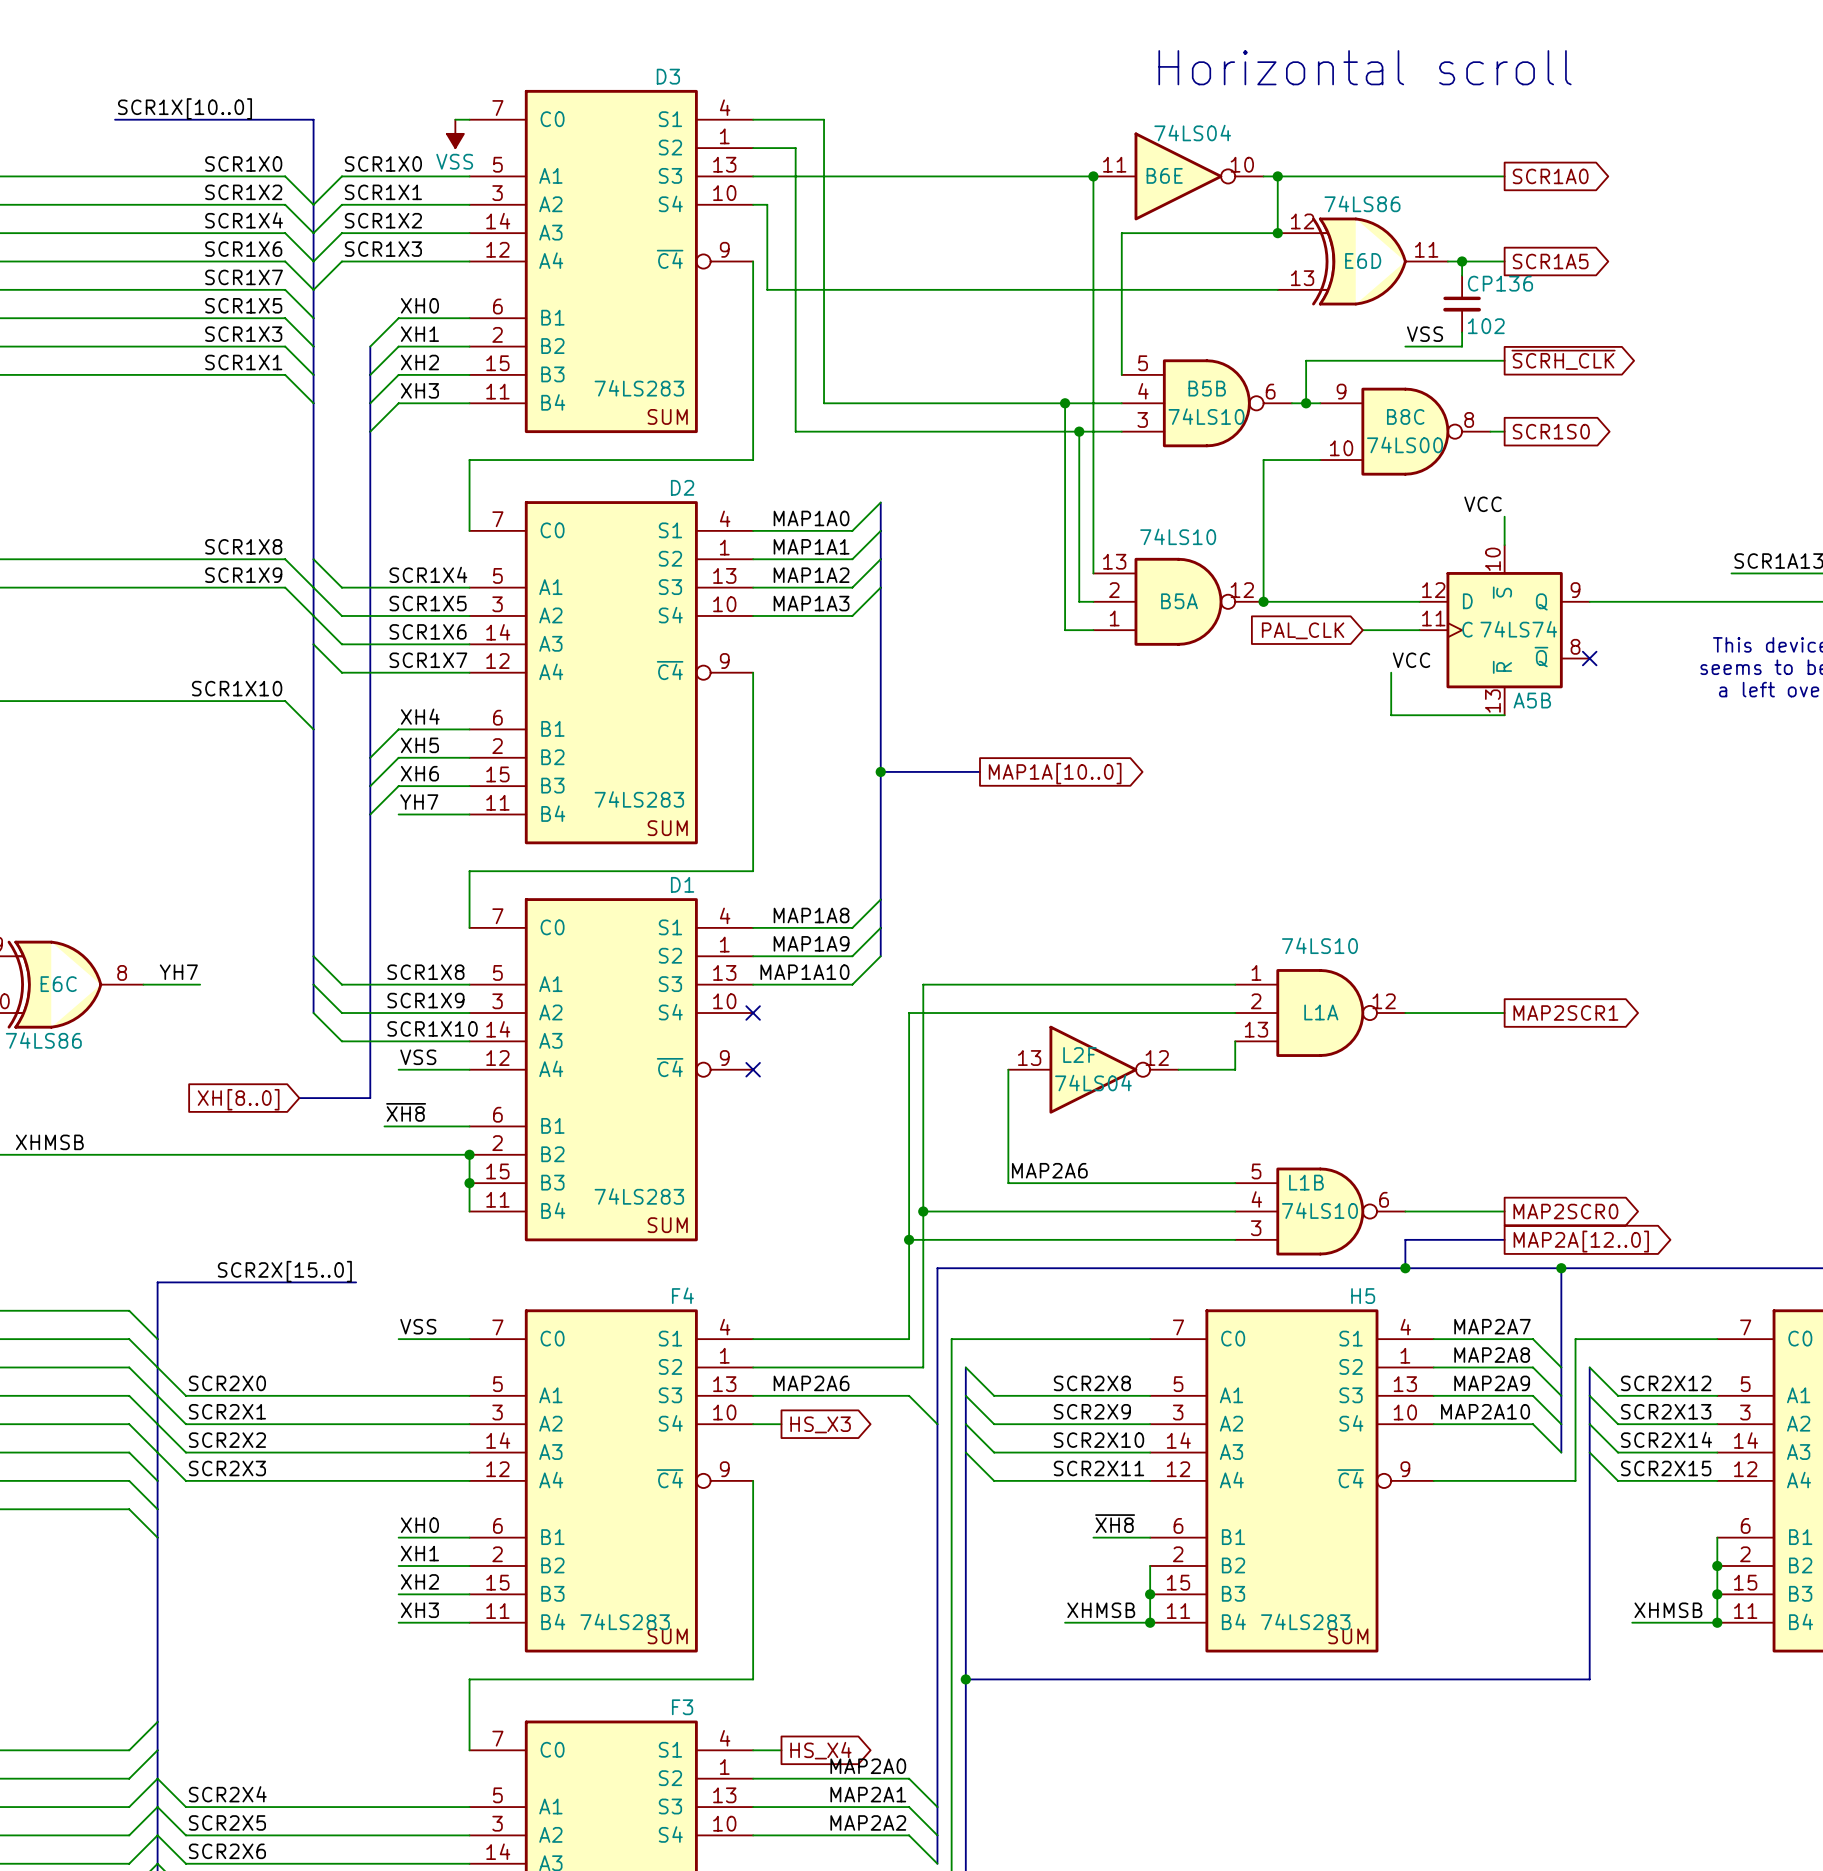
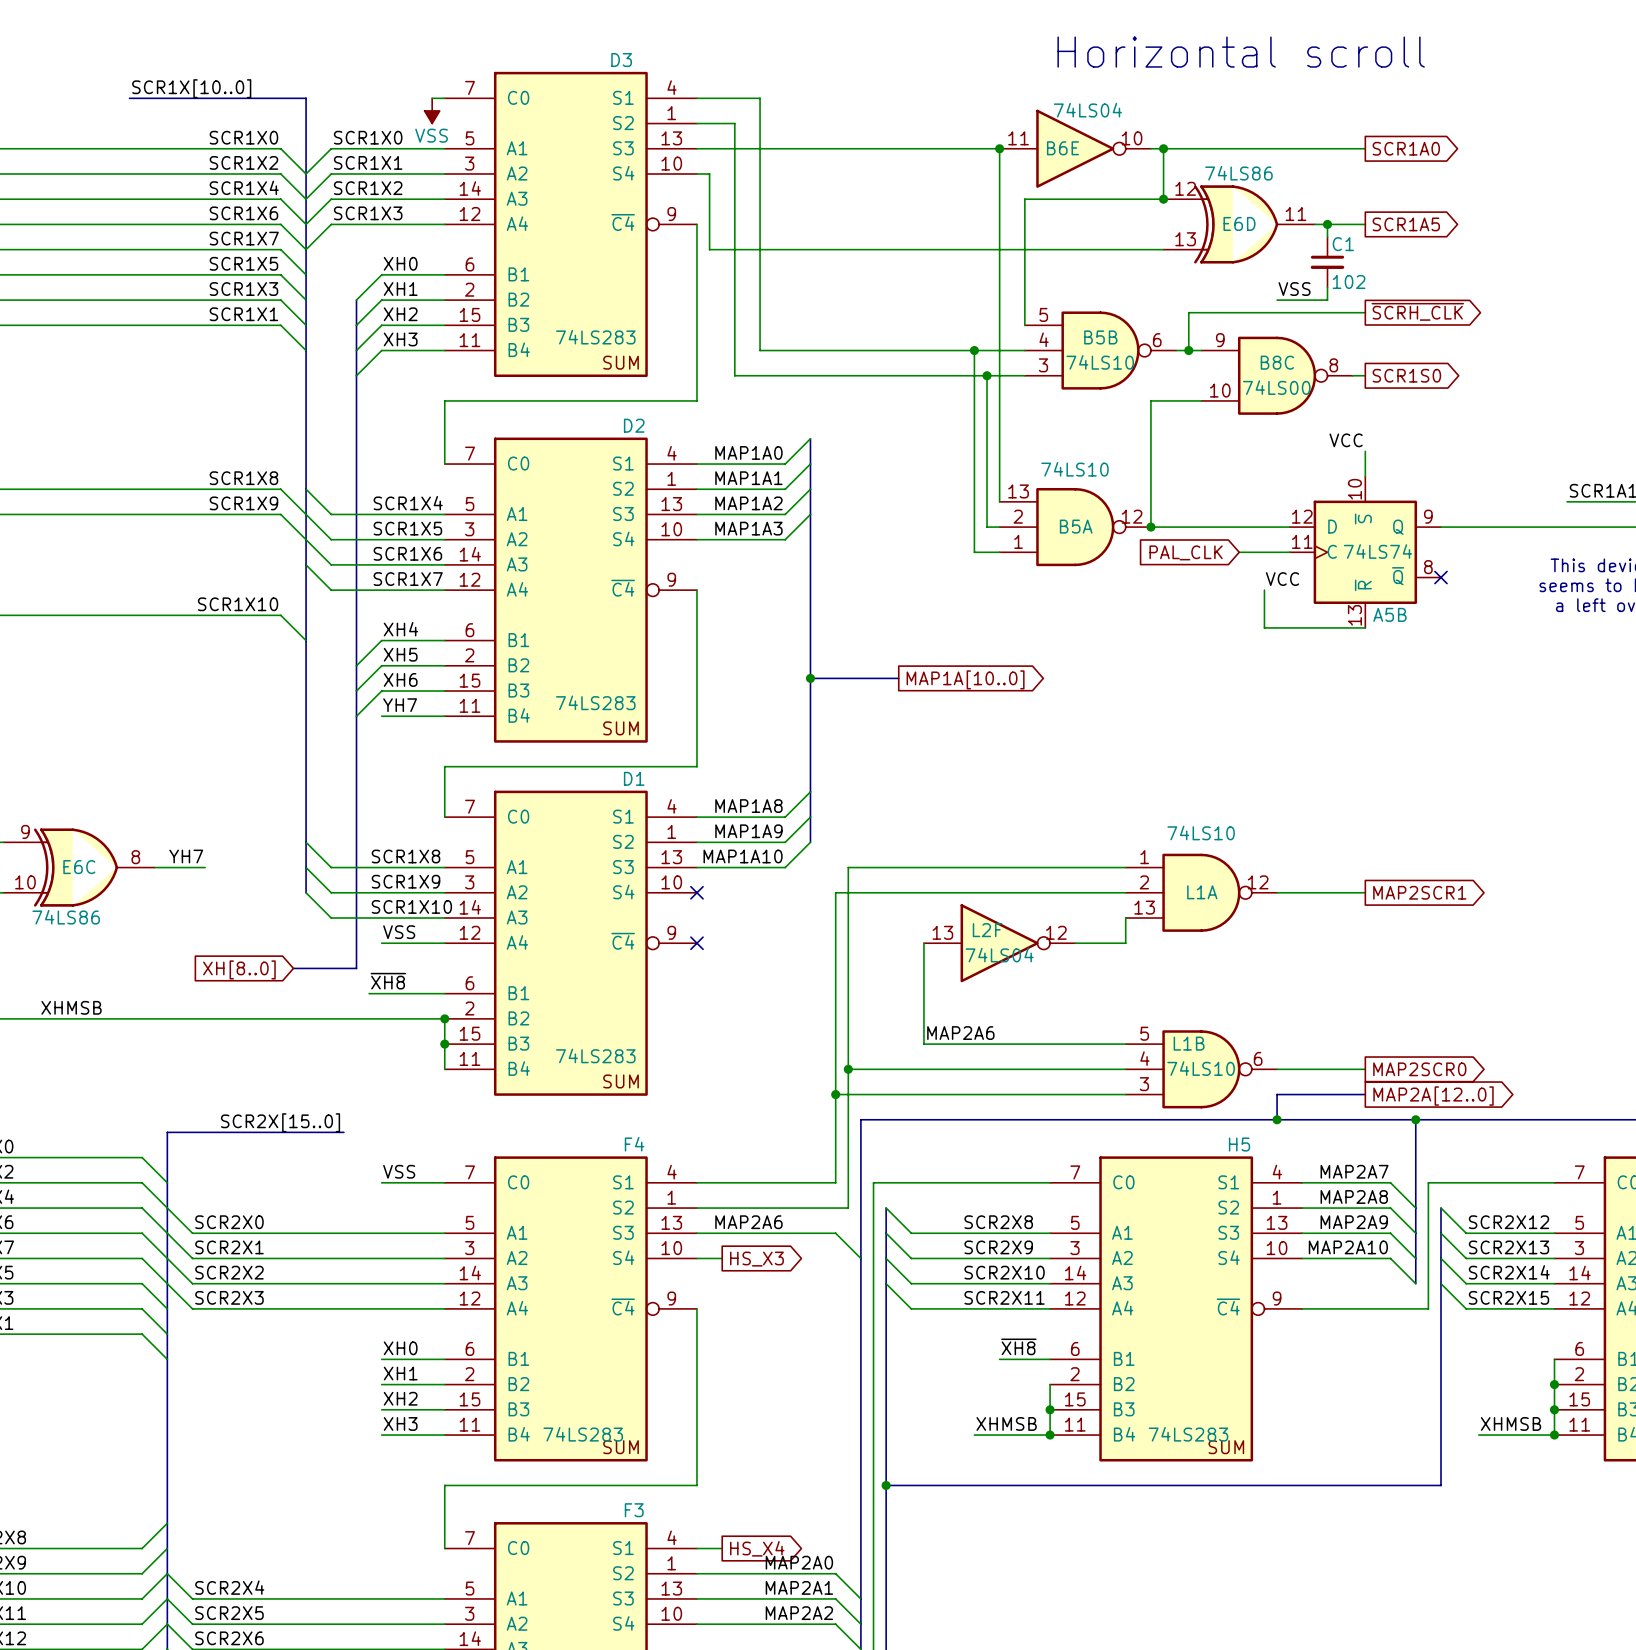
CP136 name: CP136 (1500, 283) -> C1 (1343, 244)

